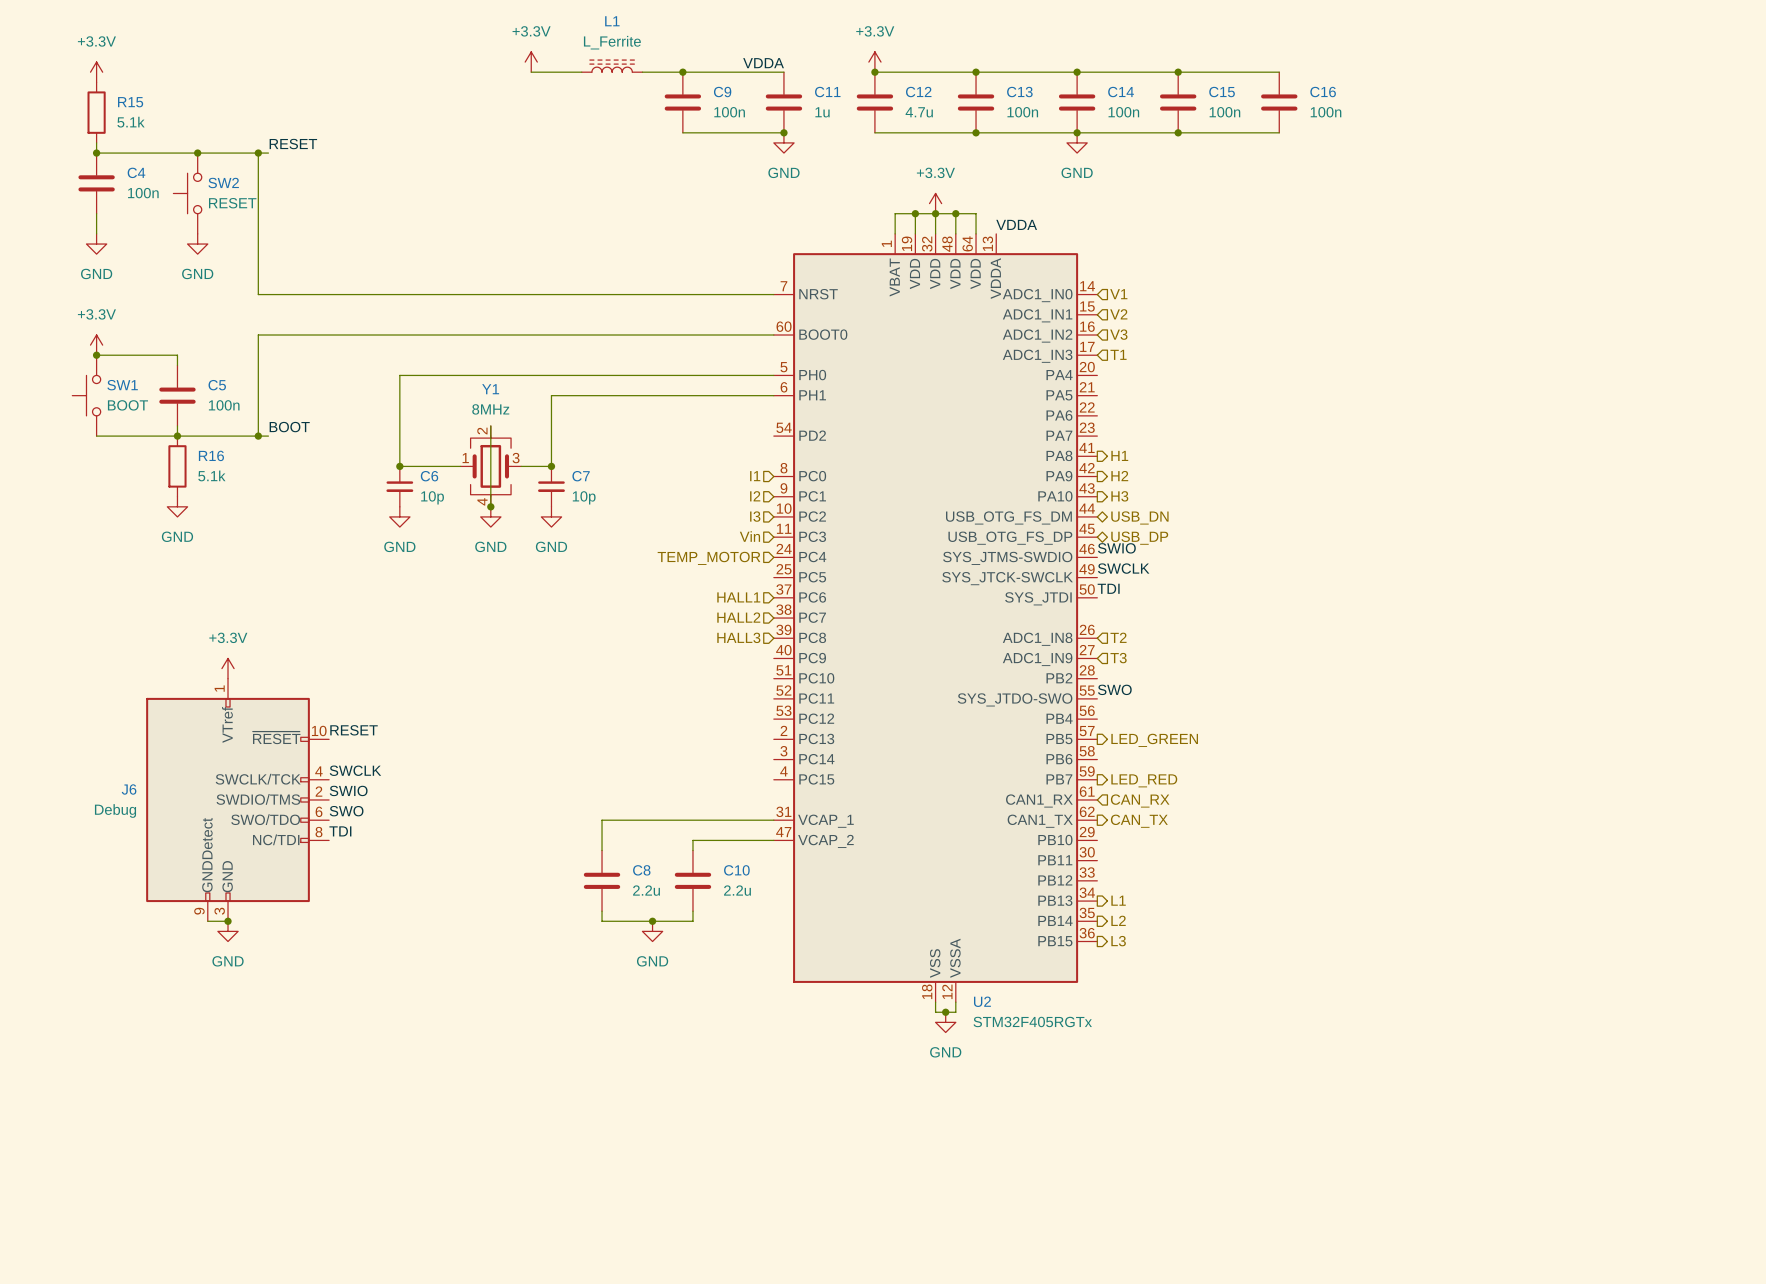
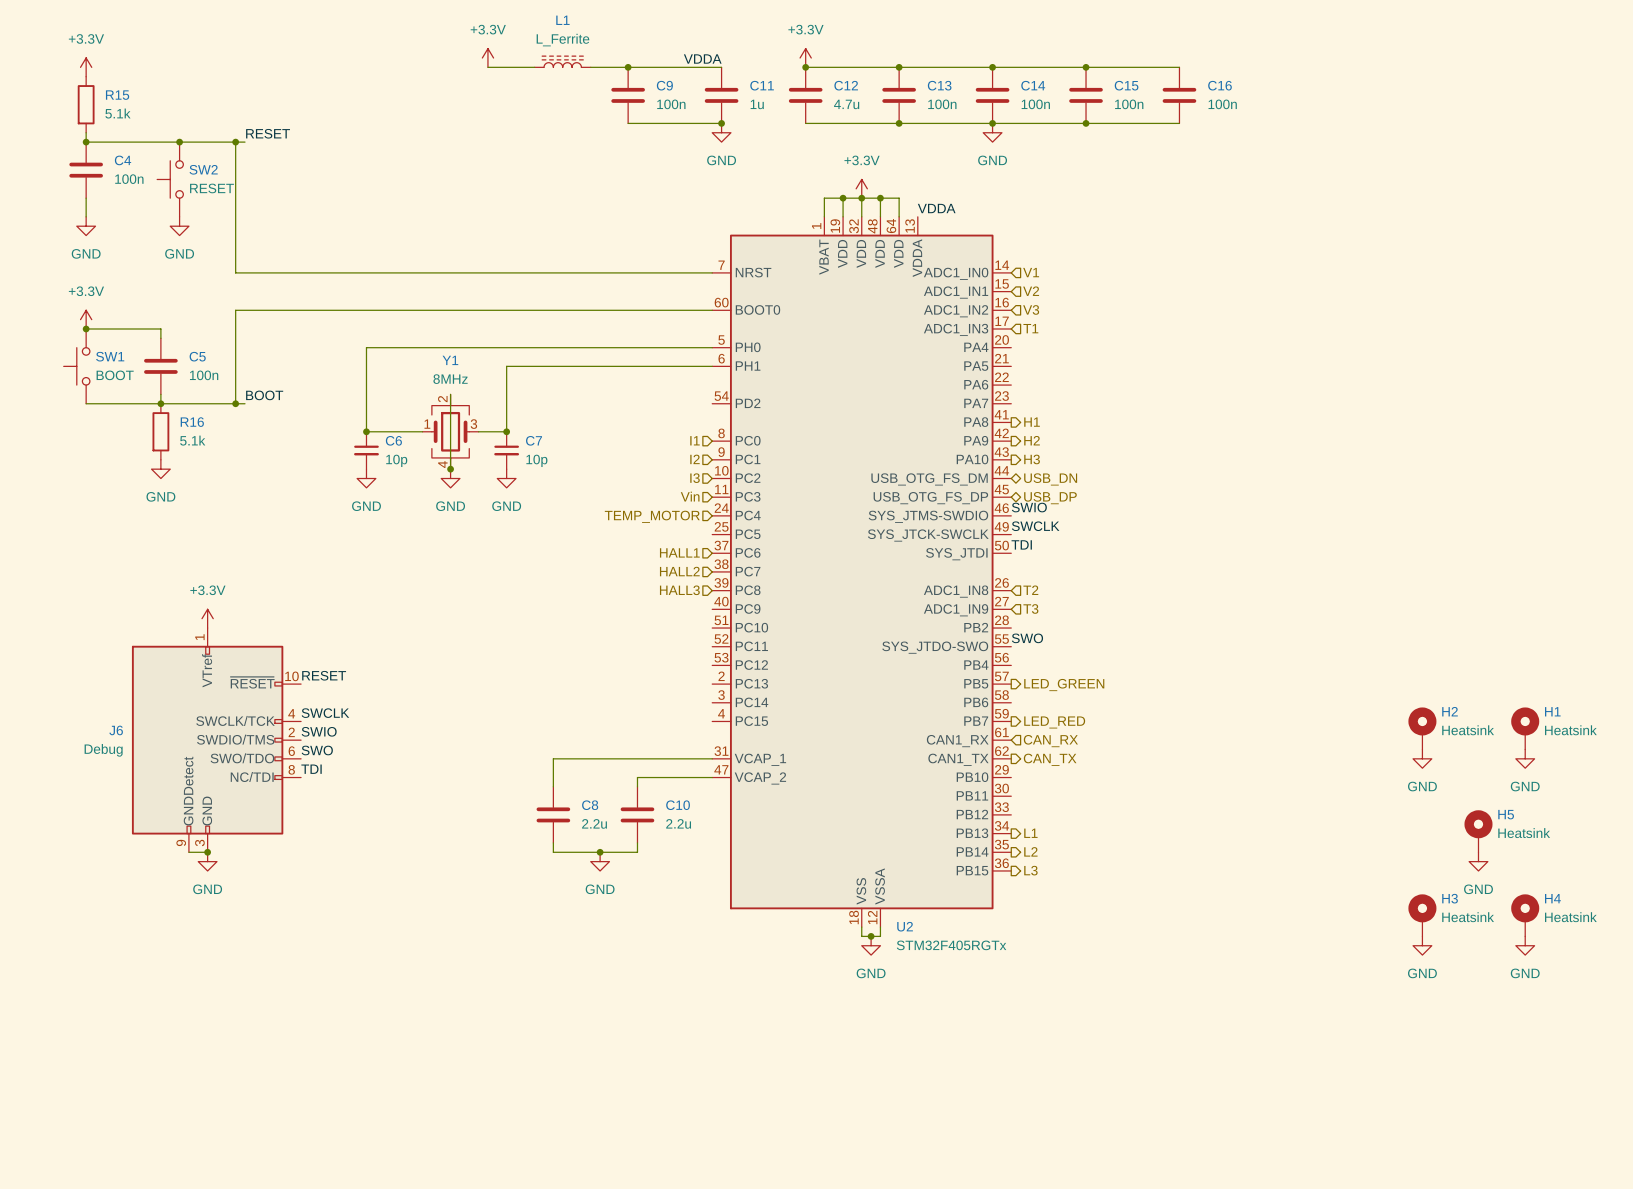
H2: none -> Heatsink (1422, 728)
H1: none -> Heatsink (1525, 728)
power symbol: none -> GND (1422, 758)
power symbol: none -> GND (1525, 758)
H5: none -> Heatsink (1478, 831)
power symbol: none -> GND (1478, 861)
H3: none -> Heatsink (1422, 915)
H4: none -> Heatsink (1525, 915)
power symbol: none -> GND (1422, 945)
power symbol: none -> GND (1525, 945)

